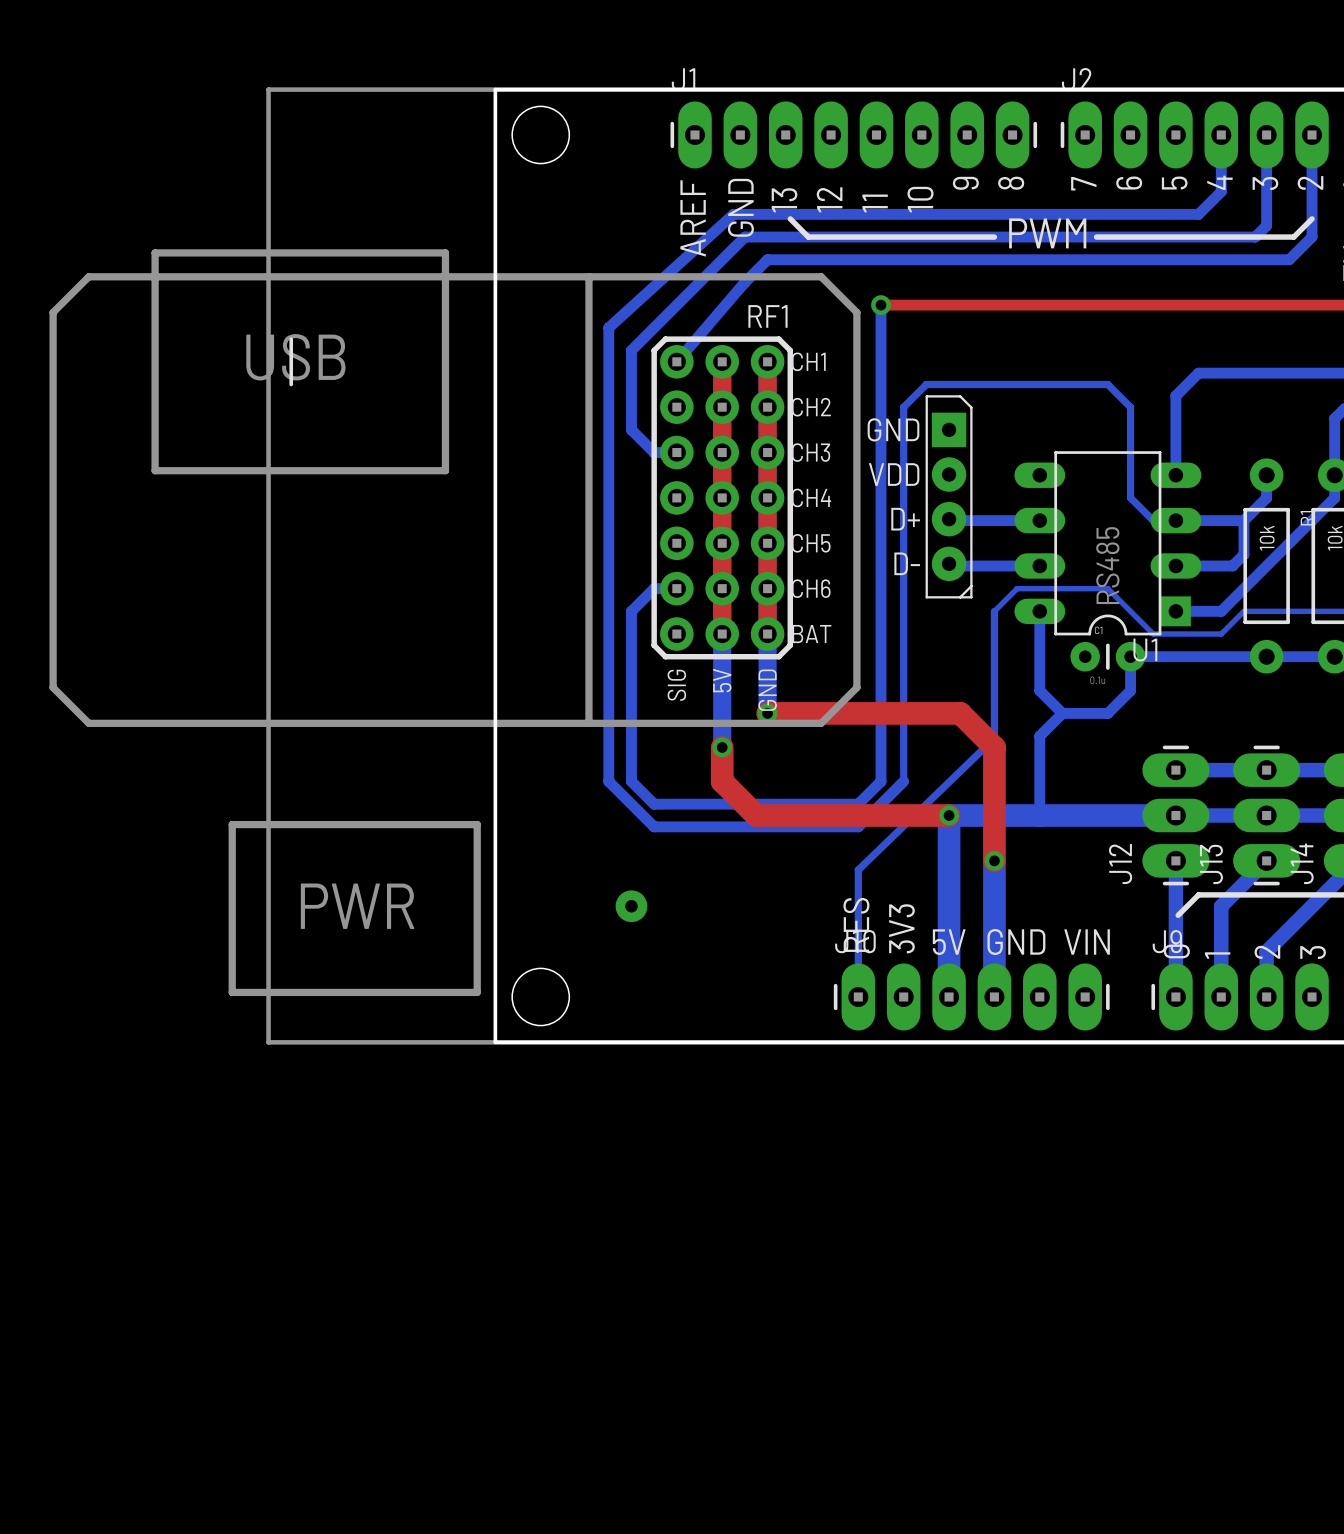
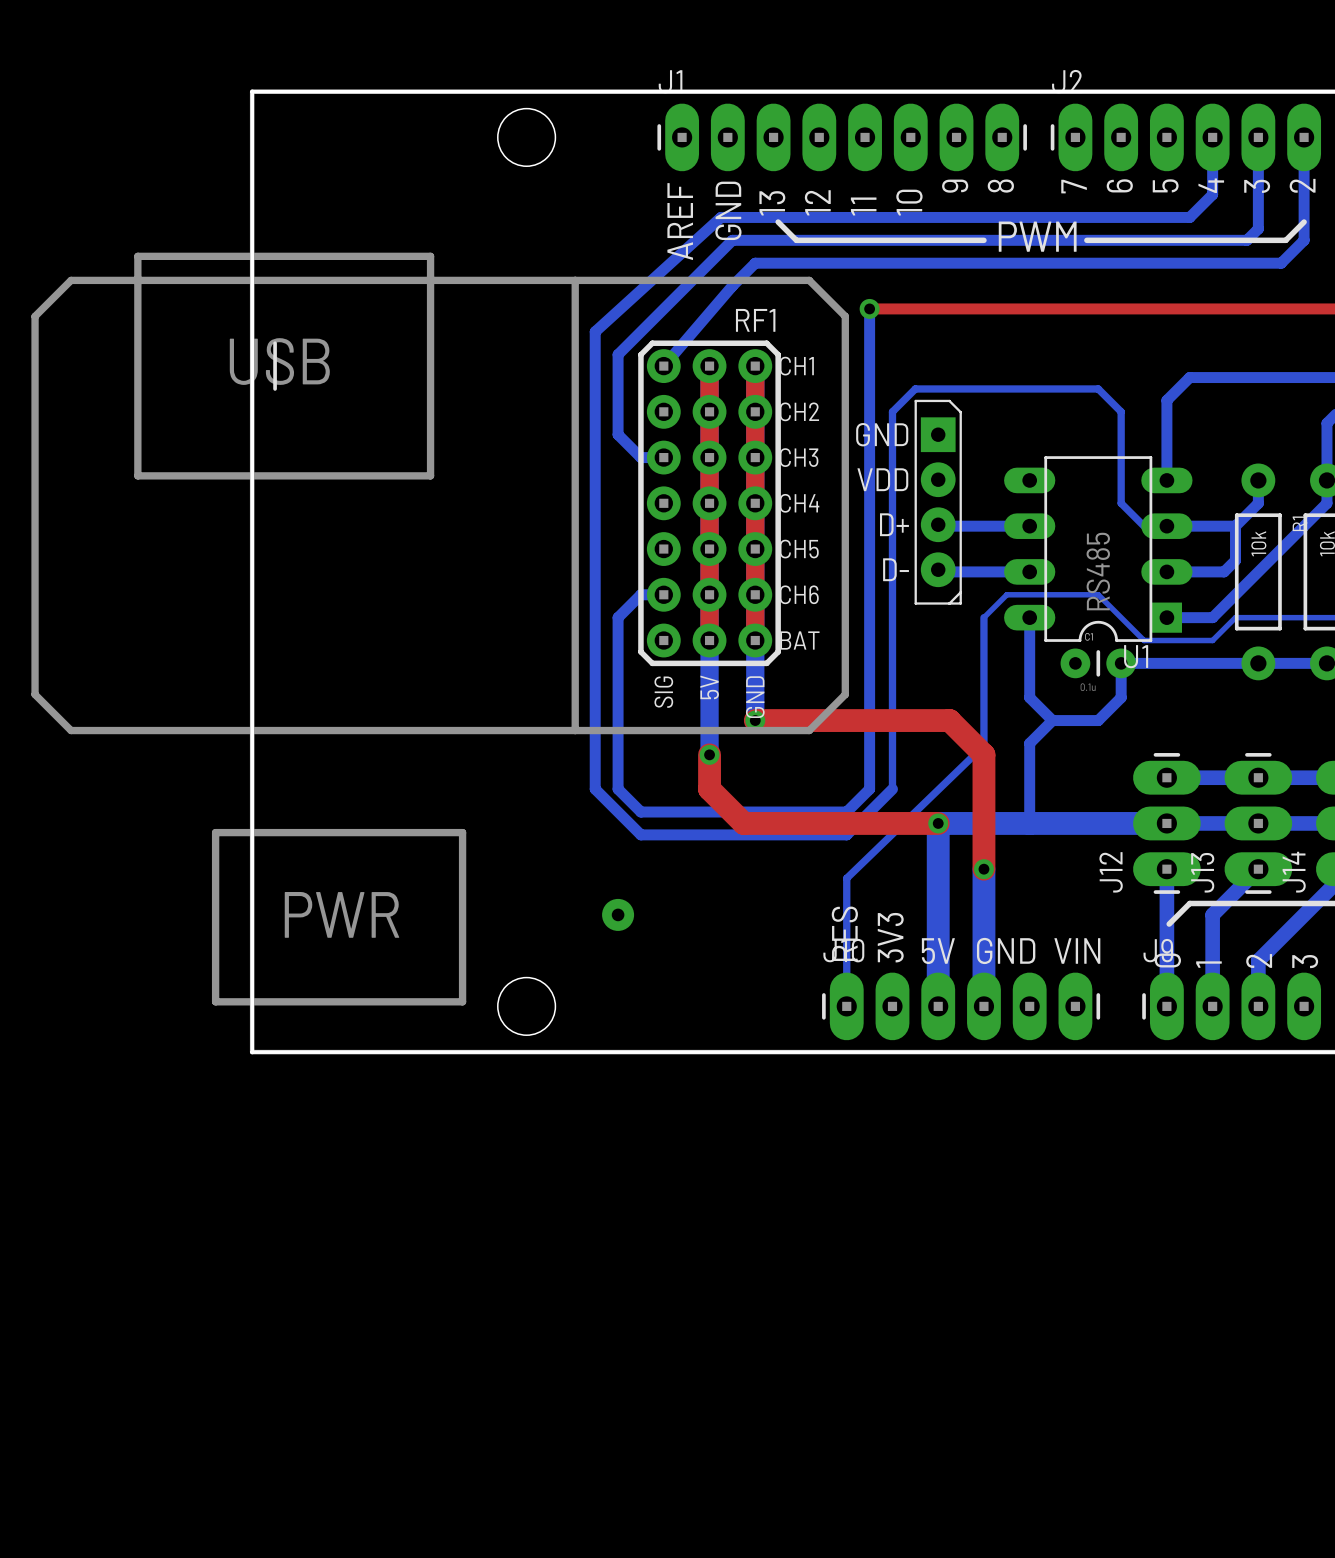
board edge: (495, 89) (495, 1042) -> (480, 91) (252, 91) (252, 1052) (480, 1052)

